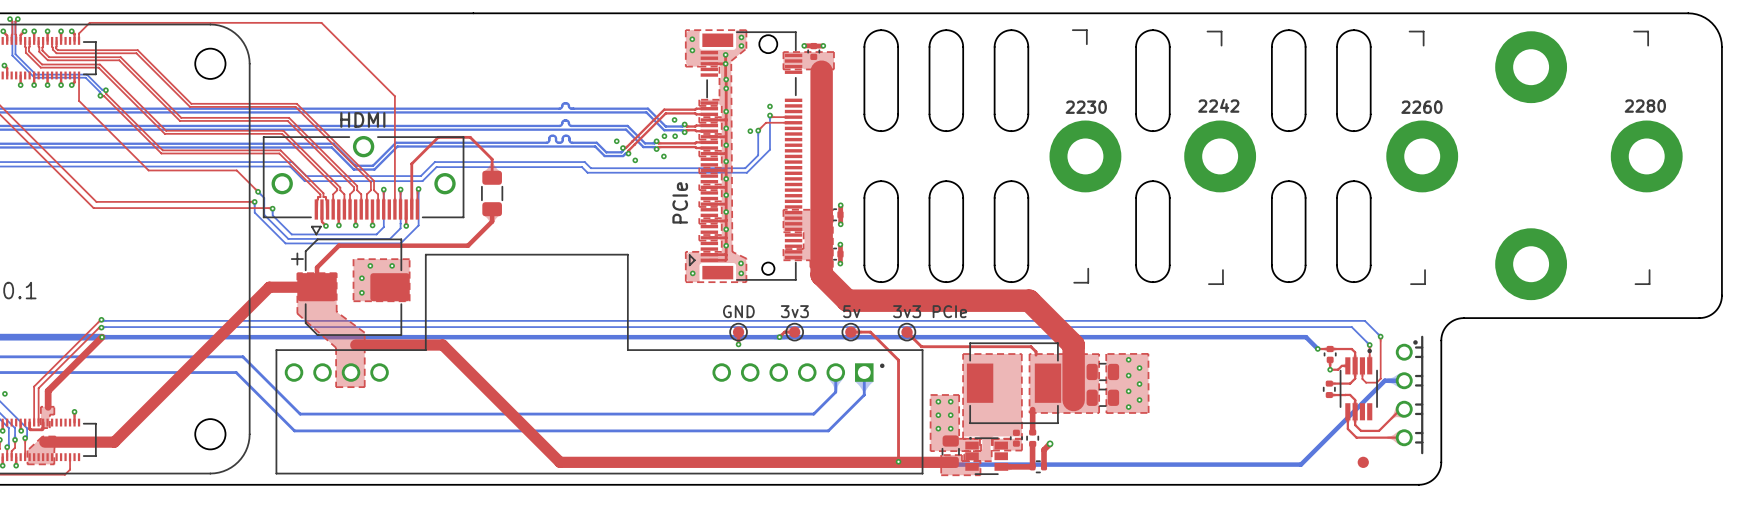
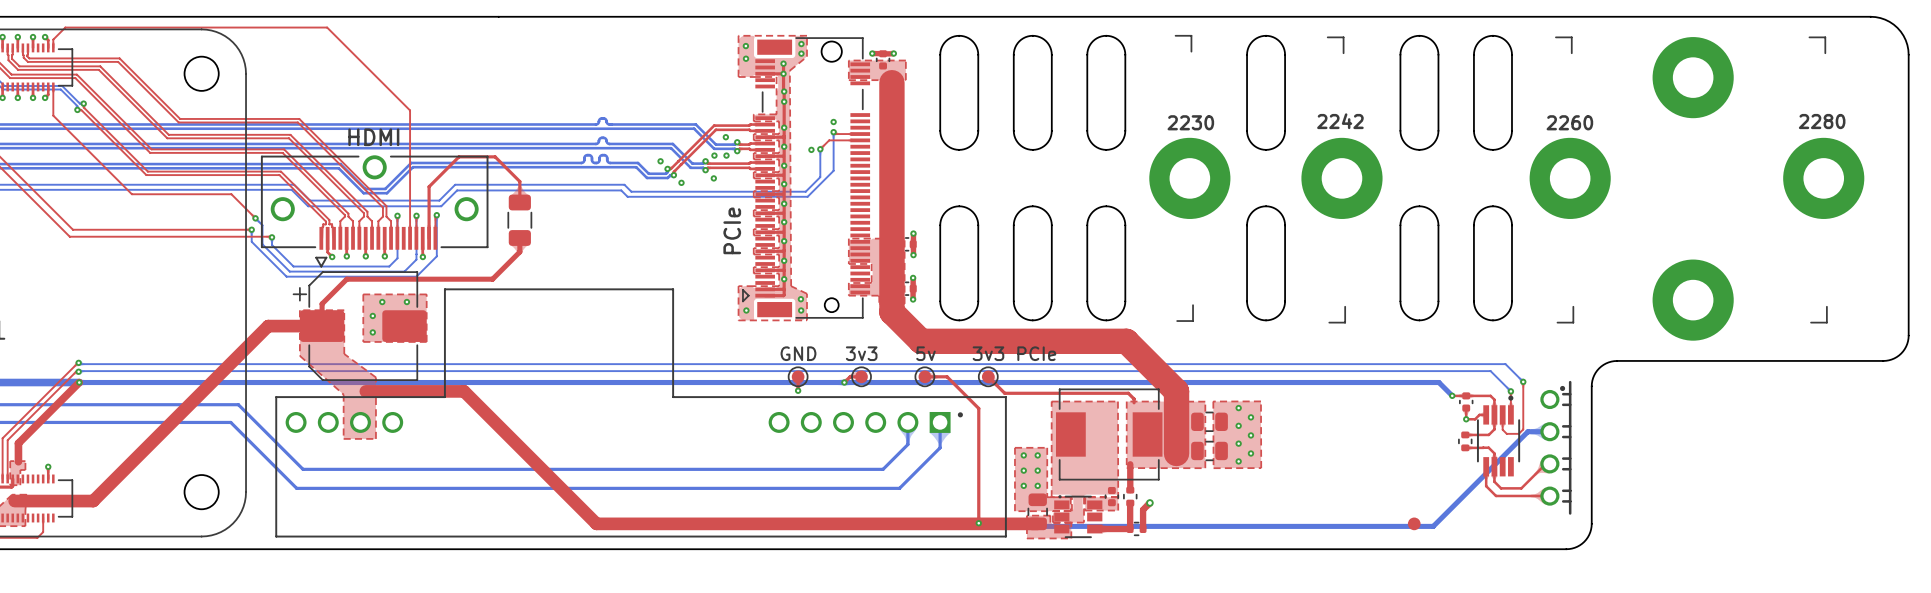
part position: (1363, 462) -> (1414, 523)

